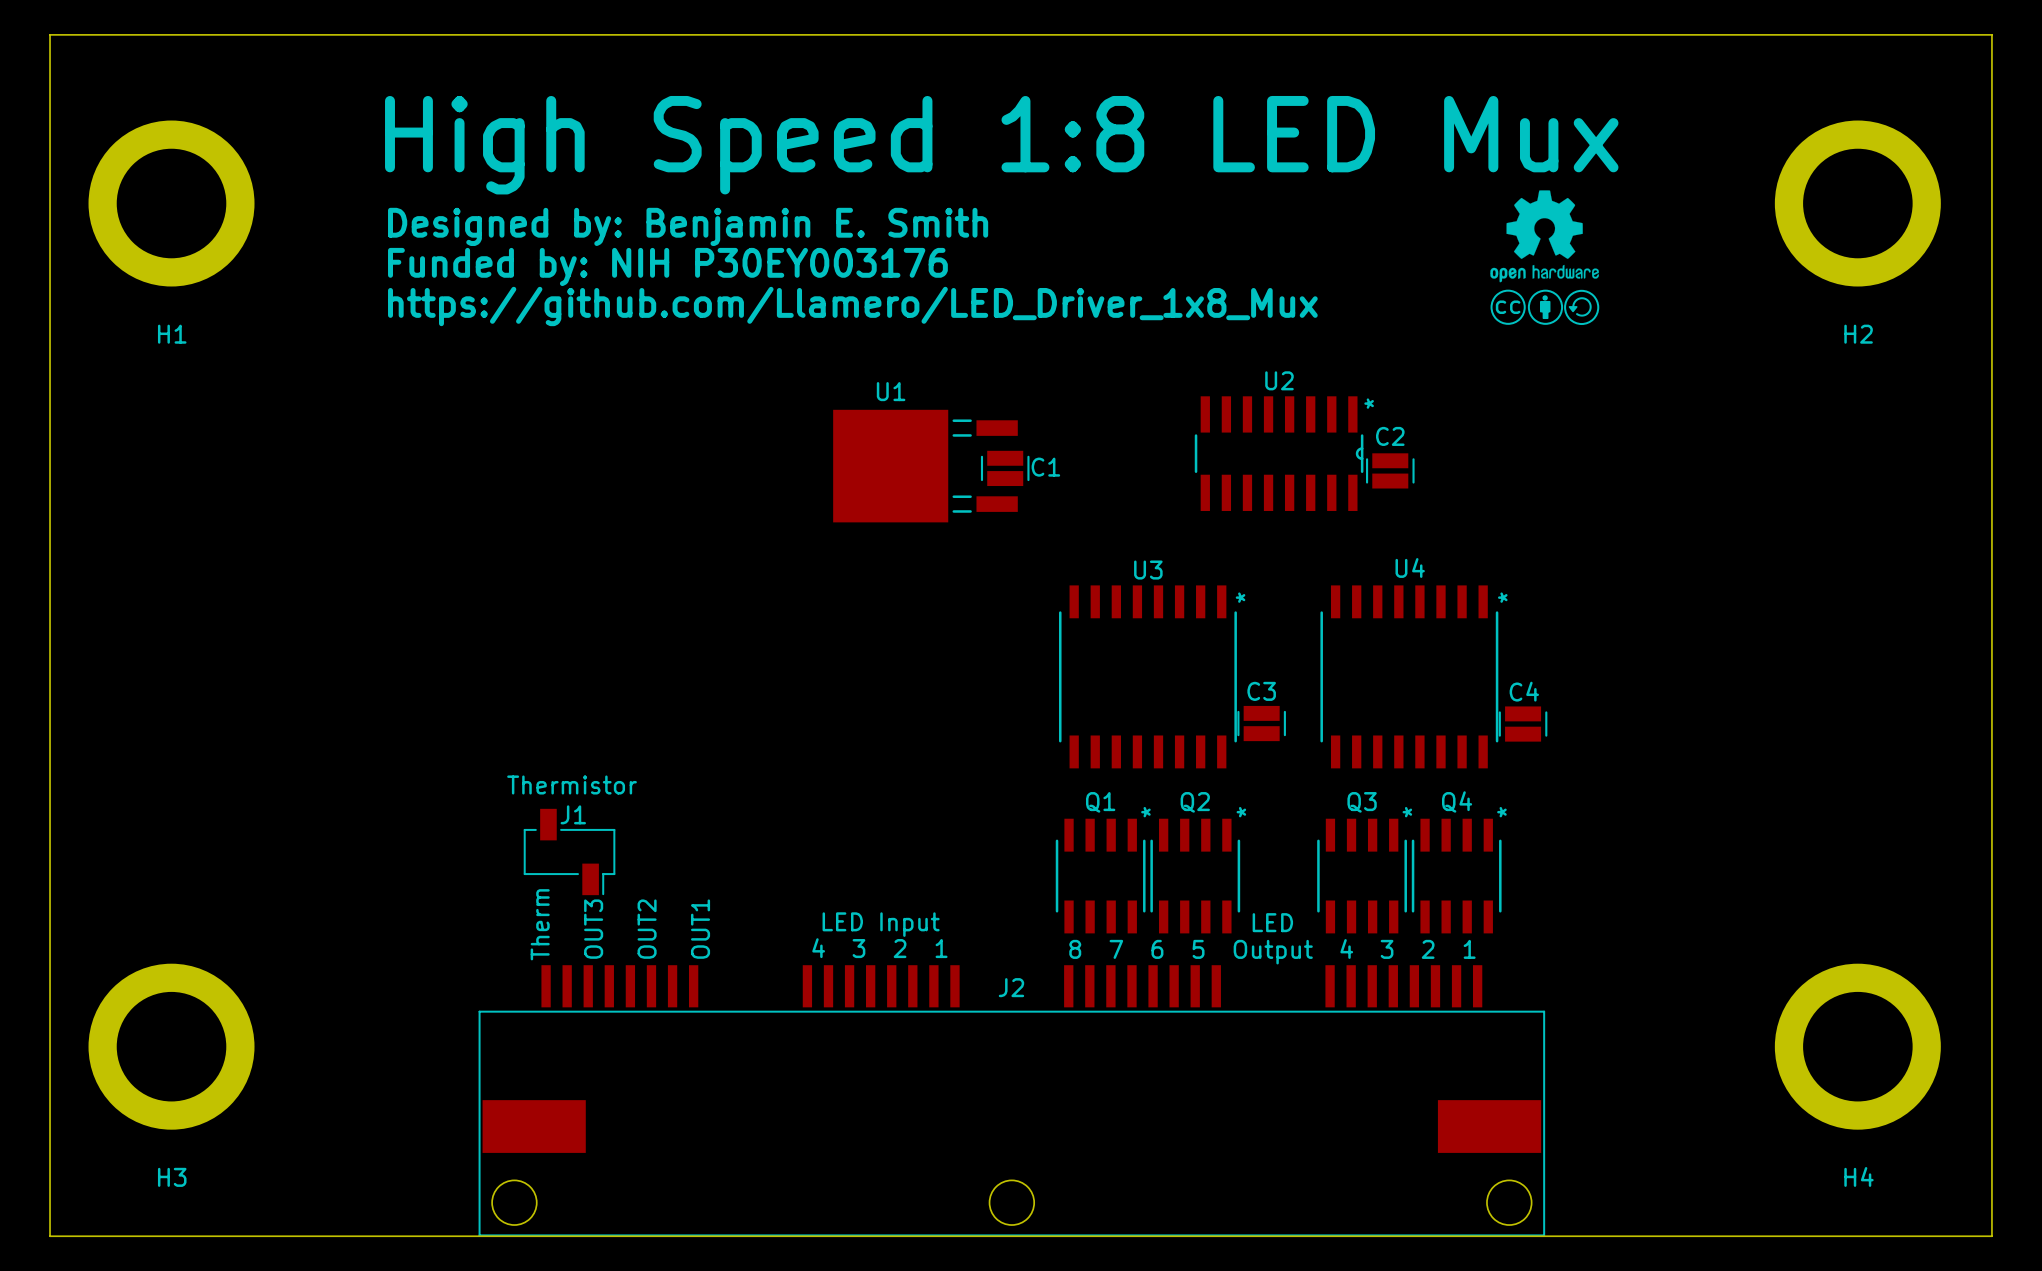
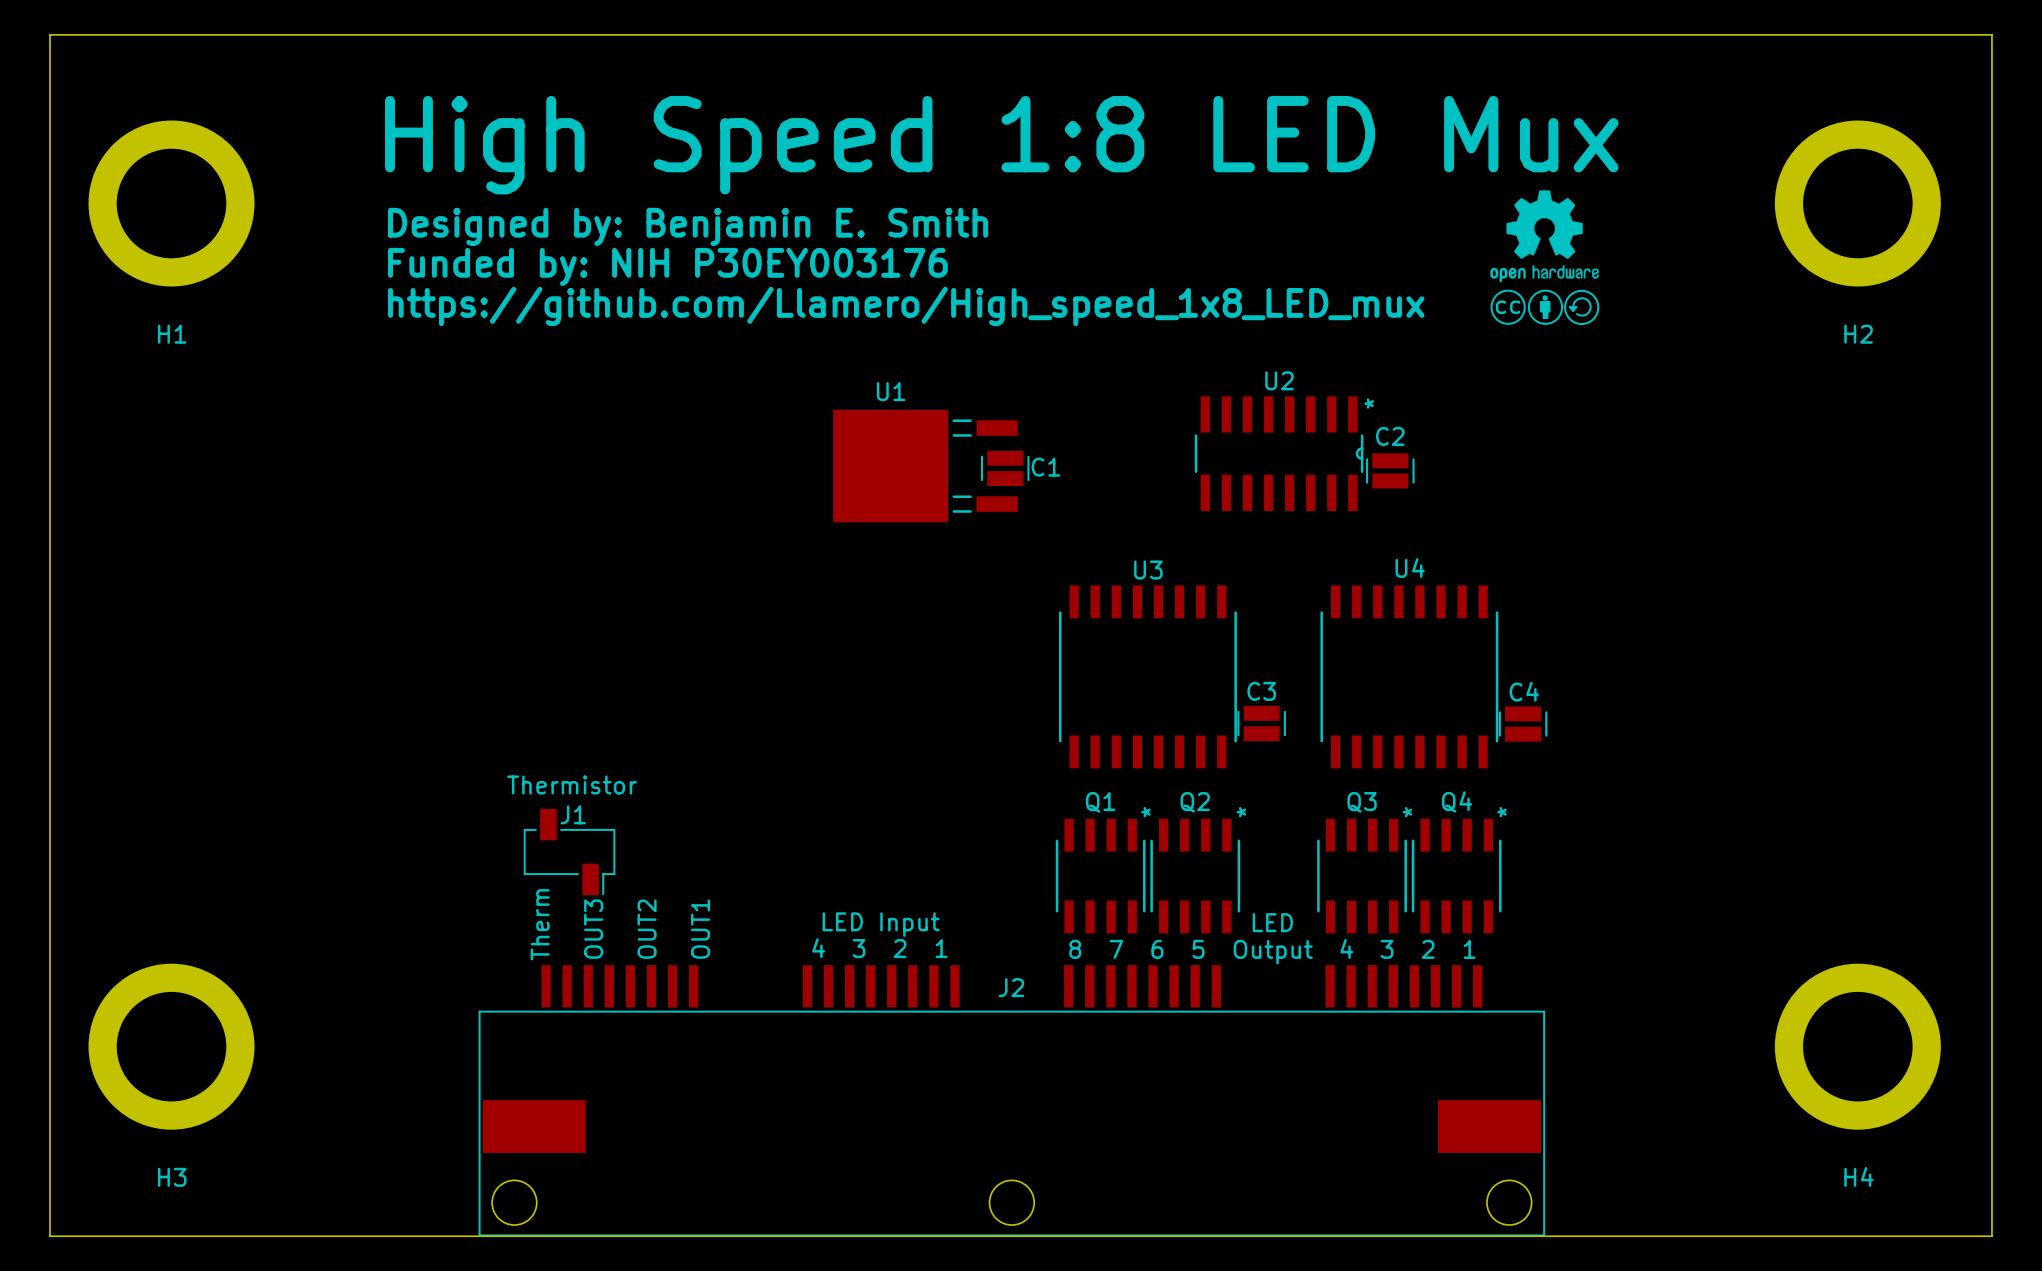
text: https://github.com/Llamero/LED_Driver_1x8_Mux (852, 306) -> https://github.com/Llamero/High_speed_1x8_LED_mux (906, 306)
U3 text: * (1240, 597) -> none
U4 text: * (1502, 597) -> none

